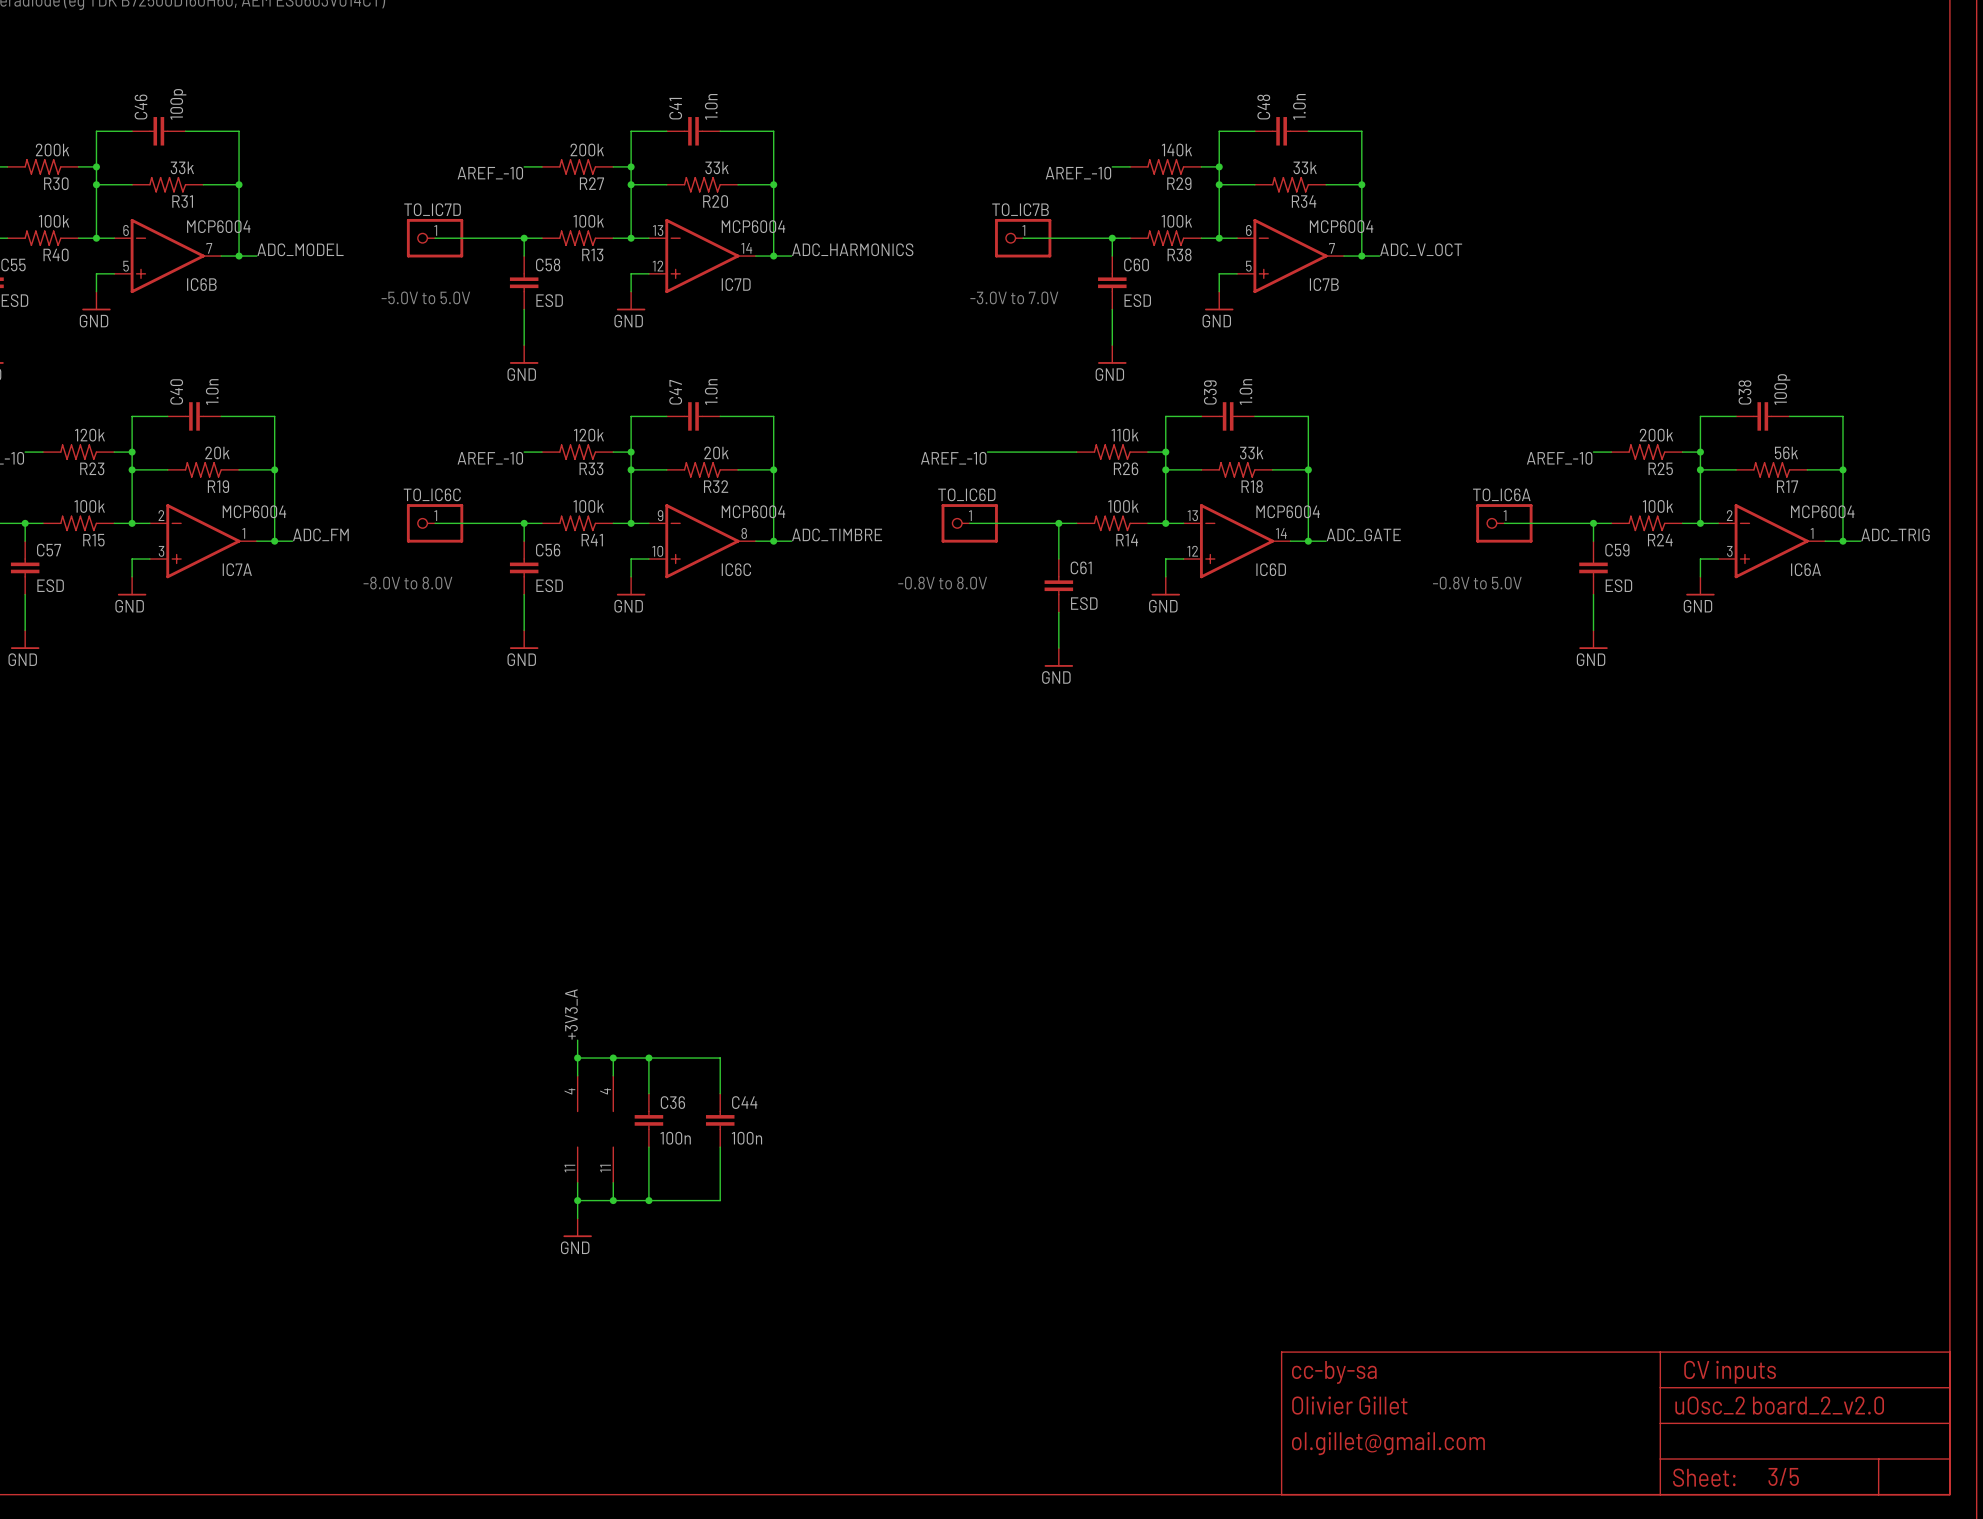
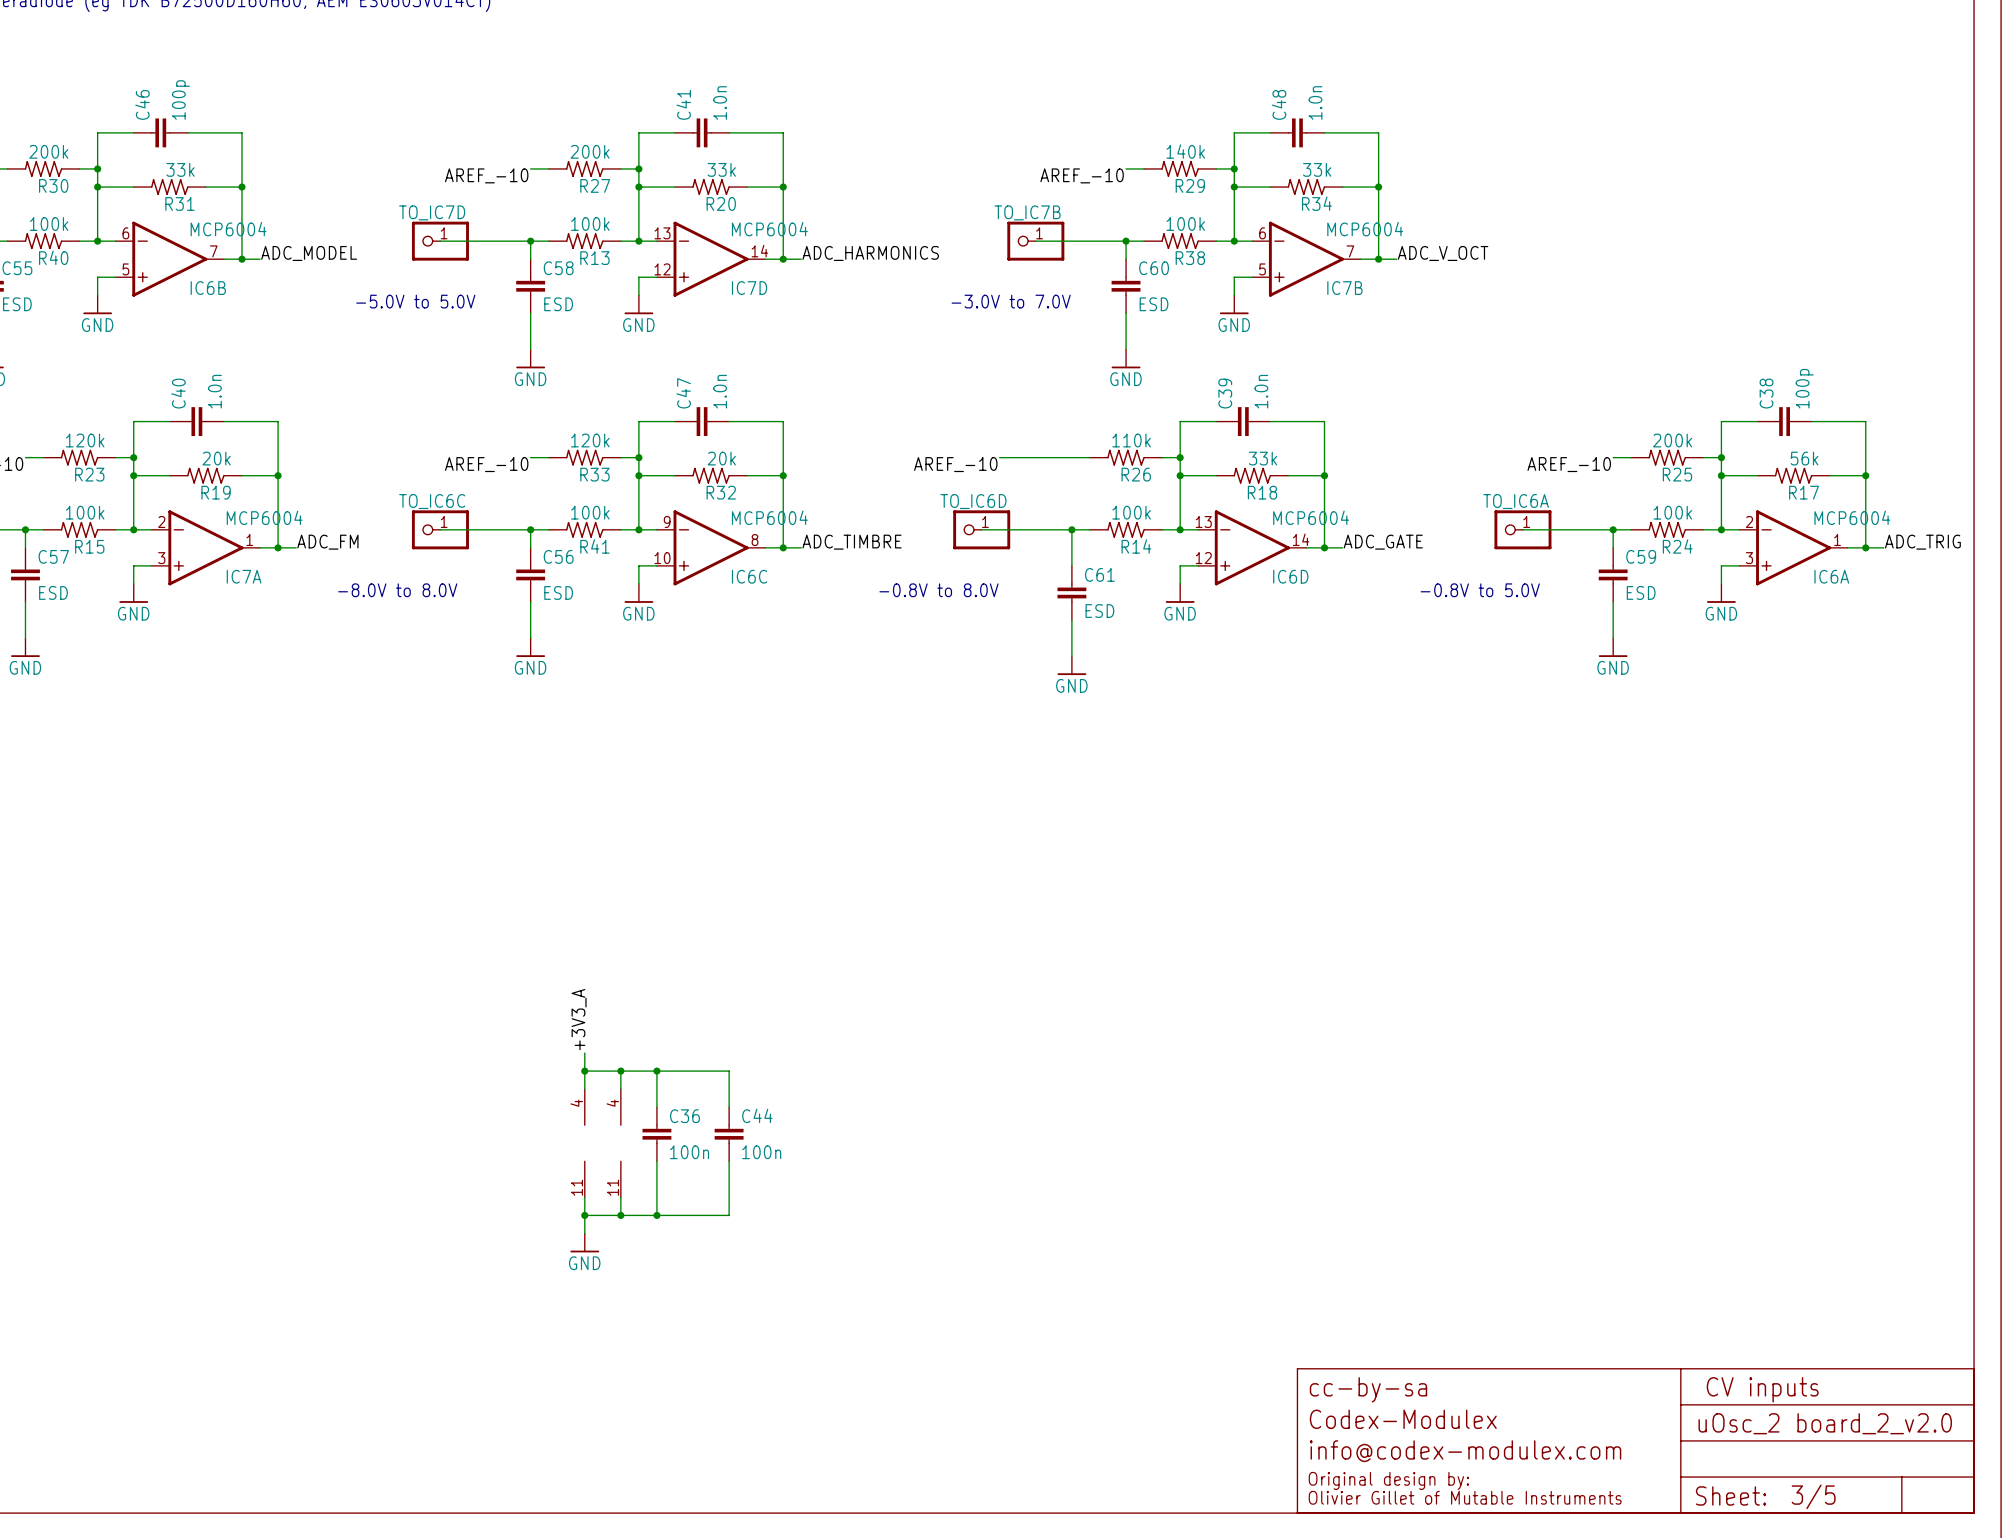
text: Olivier Gillet (1349, 1405) -> Codex-Modulex (1403, 1419)
text: none -> info@codex-modulex.com (1465, 1451)
text: ol.gillet@gmail.com (1388, 1443) -> none
text: none -> Original design by: (1388, 1480)
text: none -> Olivier Gillet of Mutable Instruments (1465, 1497)

